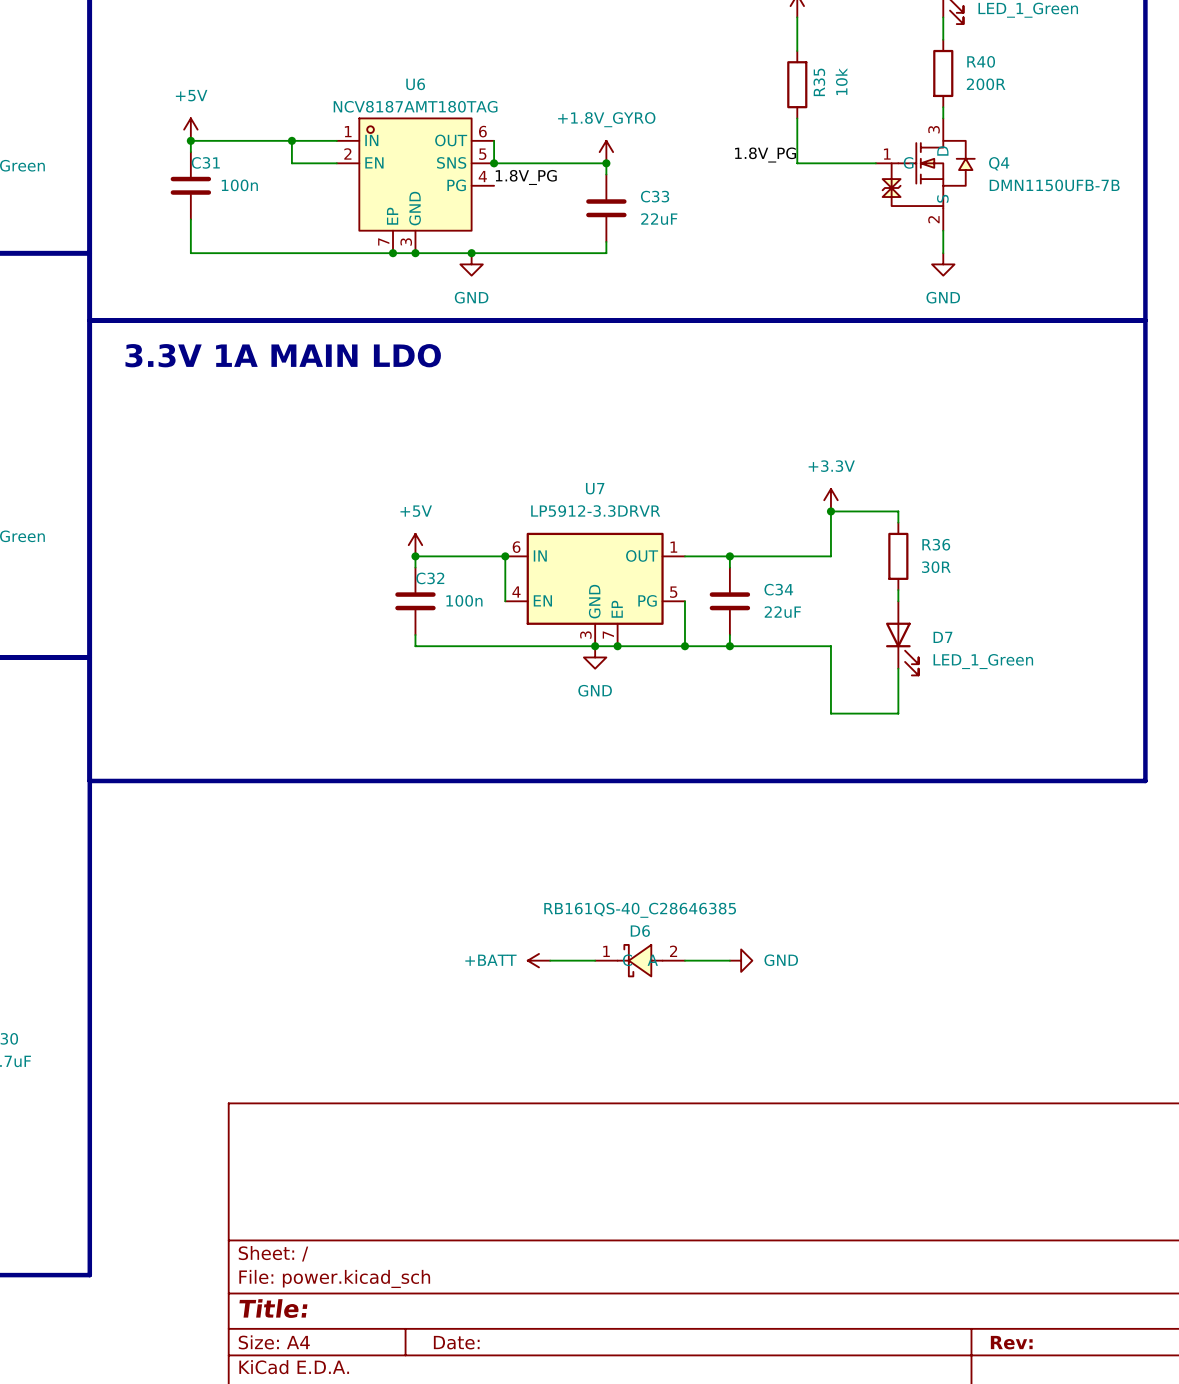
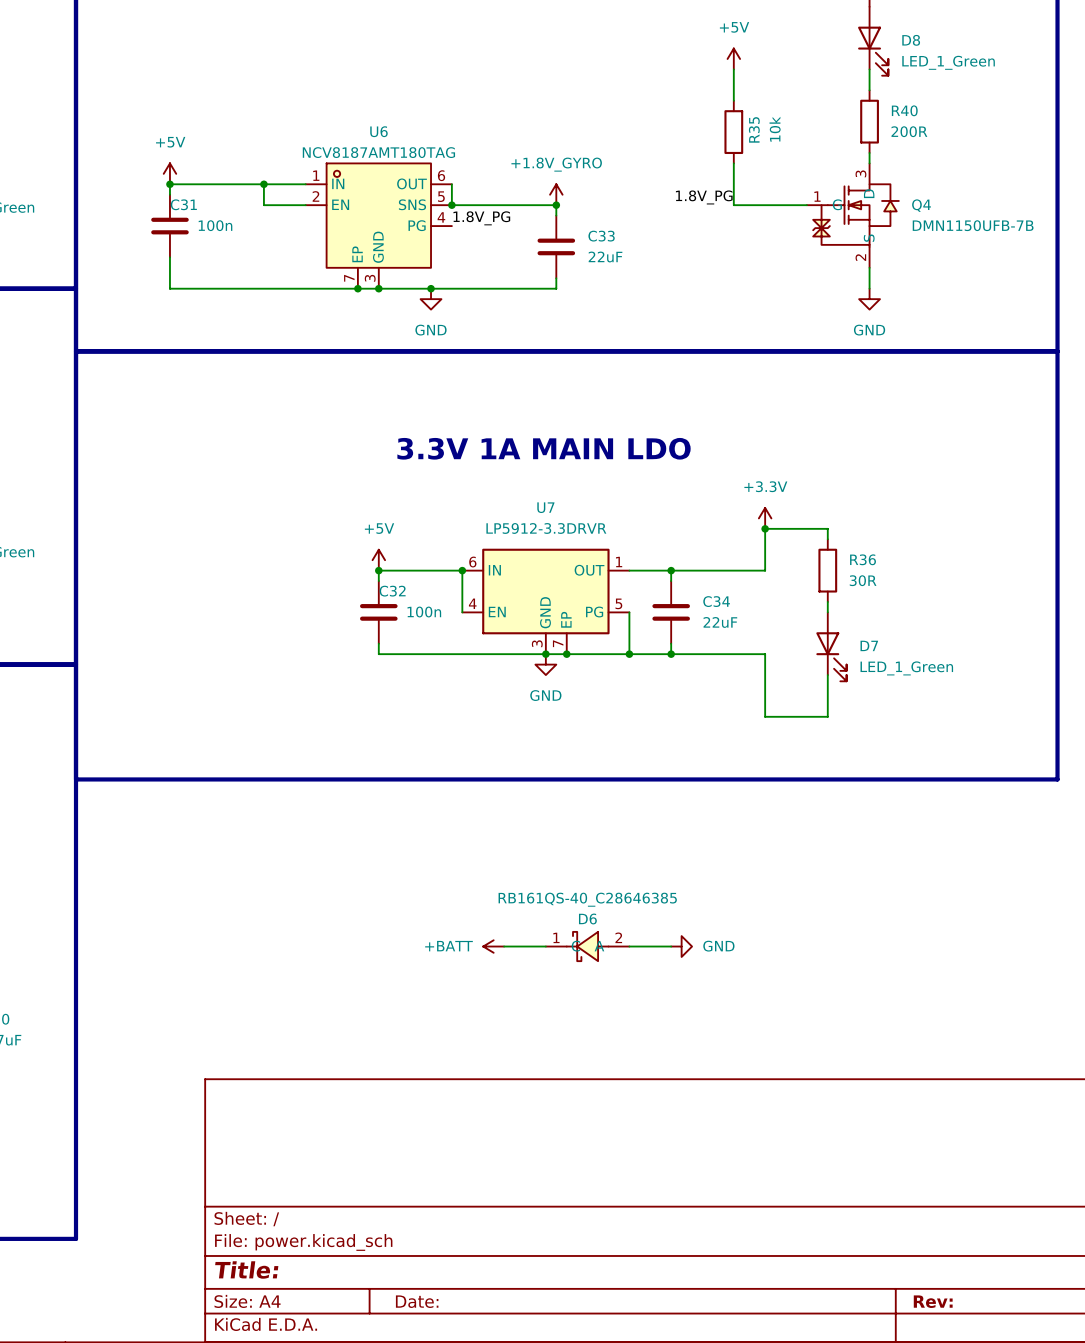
text: 3.3V 1A MAIN LDO (283, 355) -> none
text: none -> 3.3V 1A MAIN LDO (544, 448)

